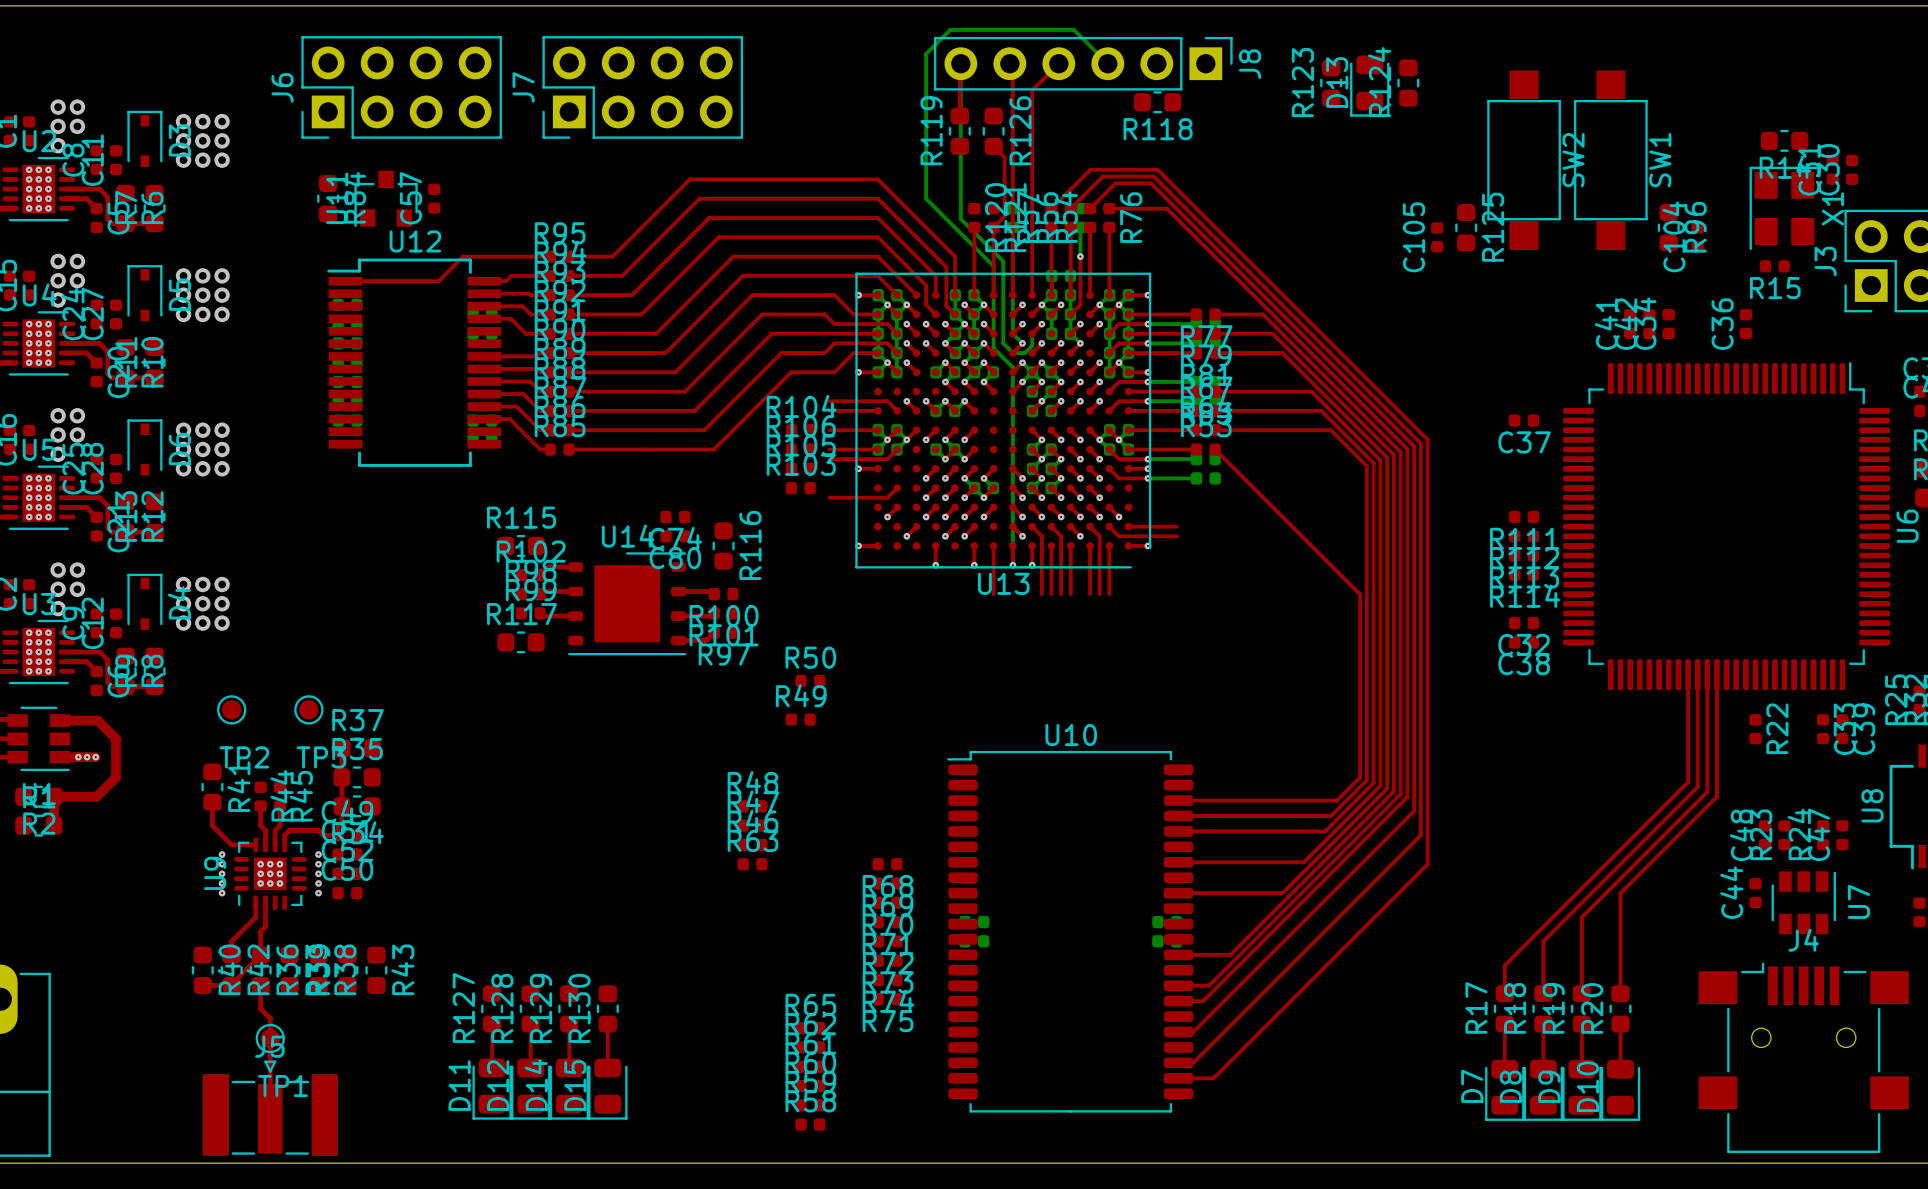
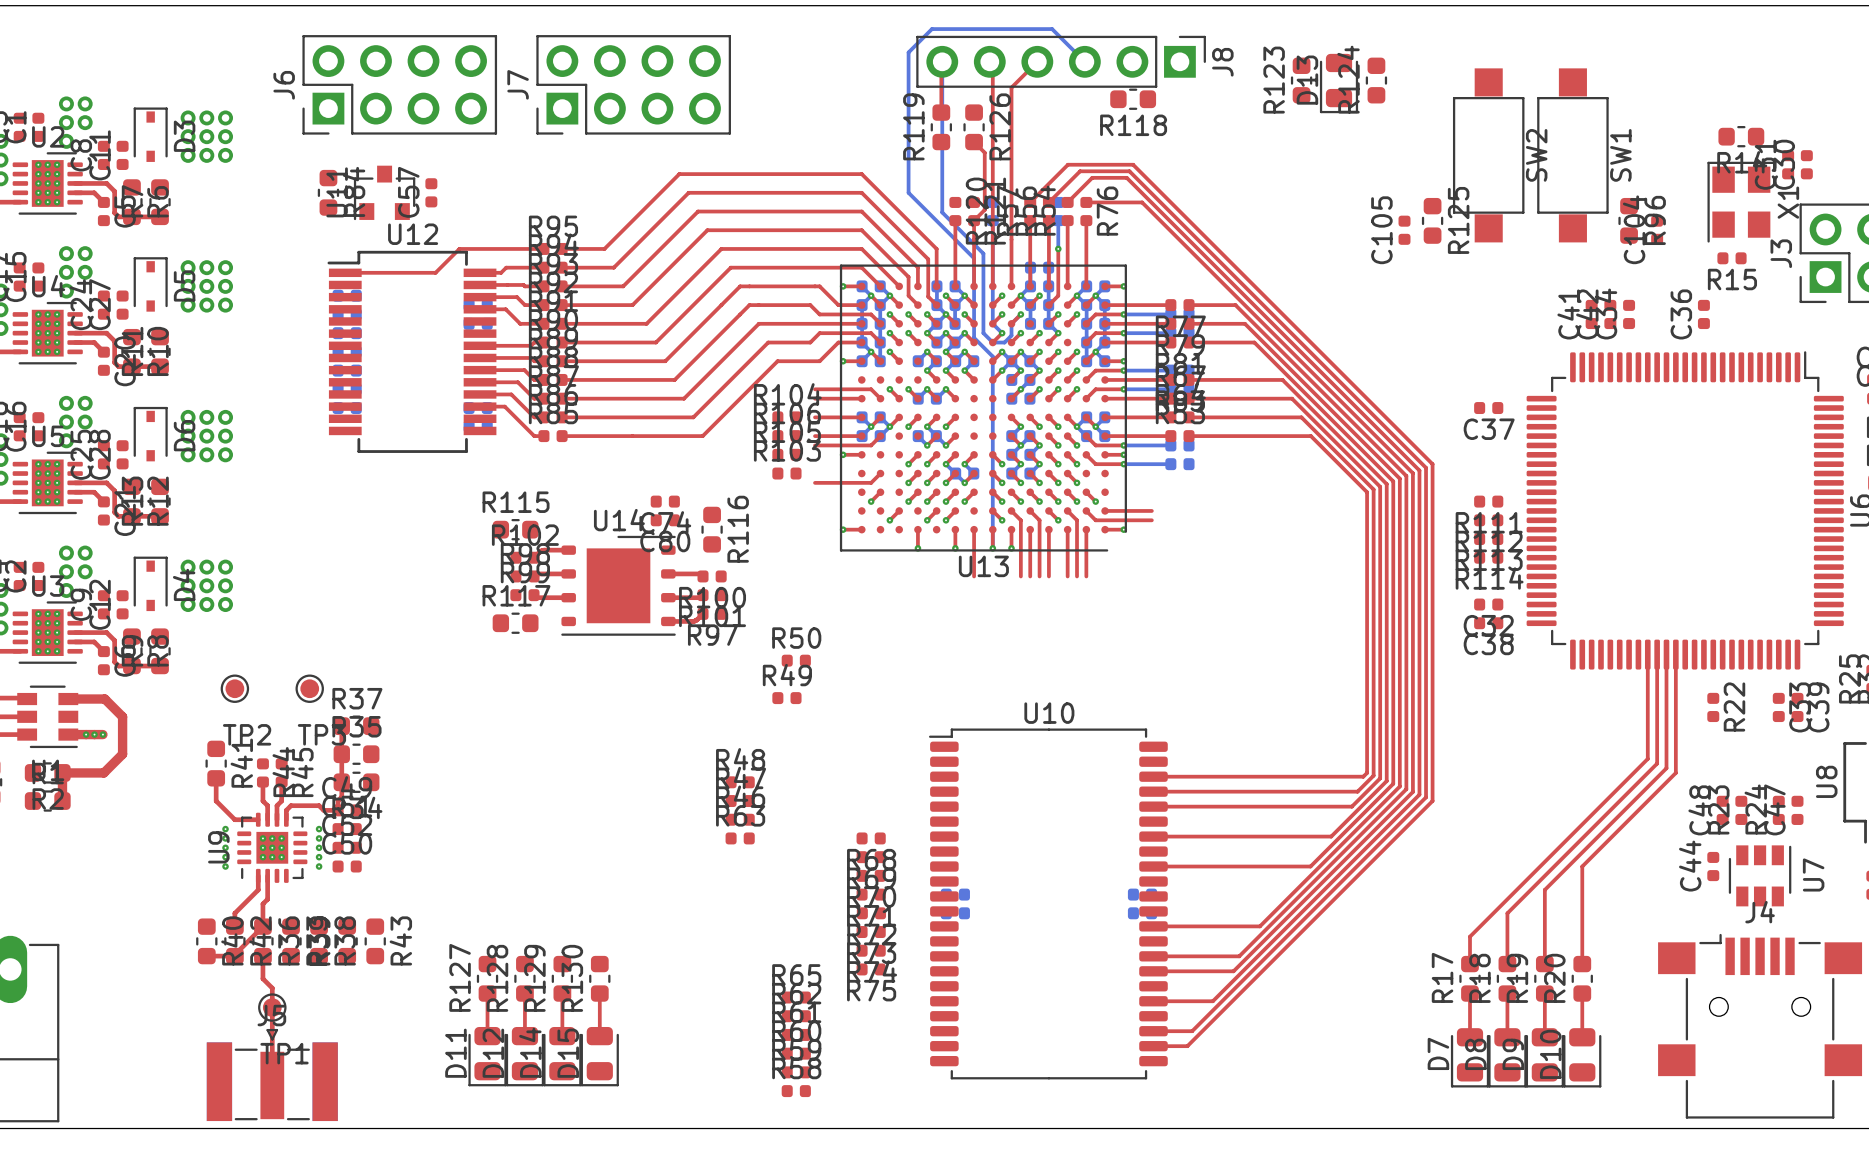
top track: (1427, 439) (1427, 864) -> (1395, 426) (1432, 464) (1432, 801) (1395, 838)
top track: (1420, 443) (1420, 835) (1193, 1062) -> (1388, 430) (1426, 467) (1426, 797) (1192, 1031) (1167, 1031)
top track: (1414, 446) (1414, 811) (1193, 1032) -> (1382, 433) (1419, 470) (1419, 794) (1212, 1001) (1167, 1001)
top track: (1215, 449) (1360, 594) (1360, 777) (1336, 800) -> (1189, 436) (1310, 436) (1367, 492) (1367, 772) (1363, 776) (1307, 776)
top track: (1407, 449) (1407, 796) (1203, 1001) -> (1375, 435) (1412, 473) (1412, 791) (1233, 971) (1177, 971)
top track: (1400, 452) (1400, 794) (1209, 985) -> (1368, 438) (1406, 475) (1406, 789) (1239, 956) (1183, 956)
top track: (1393, 454) (1393, 791) (1230, 954) -> (1362, 441) (1399, 478) (1399, 786) (1259, 926) (1203, 926)
top track: (1387, 457) (1387, 788) (1282, 893) -> (1355, 443) (1393, 481) (1393, 783) (1310, 866) (1254, 866)
top track: (1380, 460) (1380, 785) (1303, 862) -> (1349, 446) (1386, 484) (1386, 781) (1331, 836) (1275, 836)
top track: (1373, 463) (1373, 782) (1325, 831) -> (1342, 449) (1380, 486) (1380, 778) (1351, 806) (1295, 806)
top track: (1366, 465) (1366, 780) (1331, 815) -> (1336, 452) (1373, 489) (1373, 775) (1357, 791) (1301, 791)

